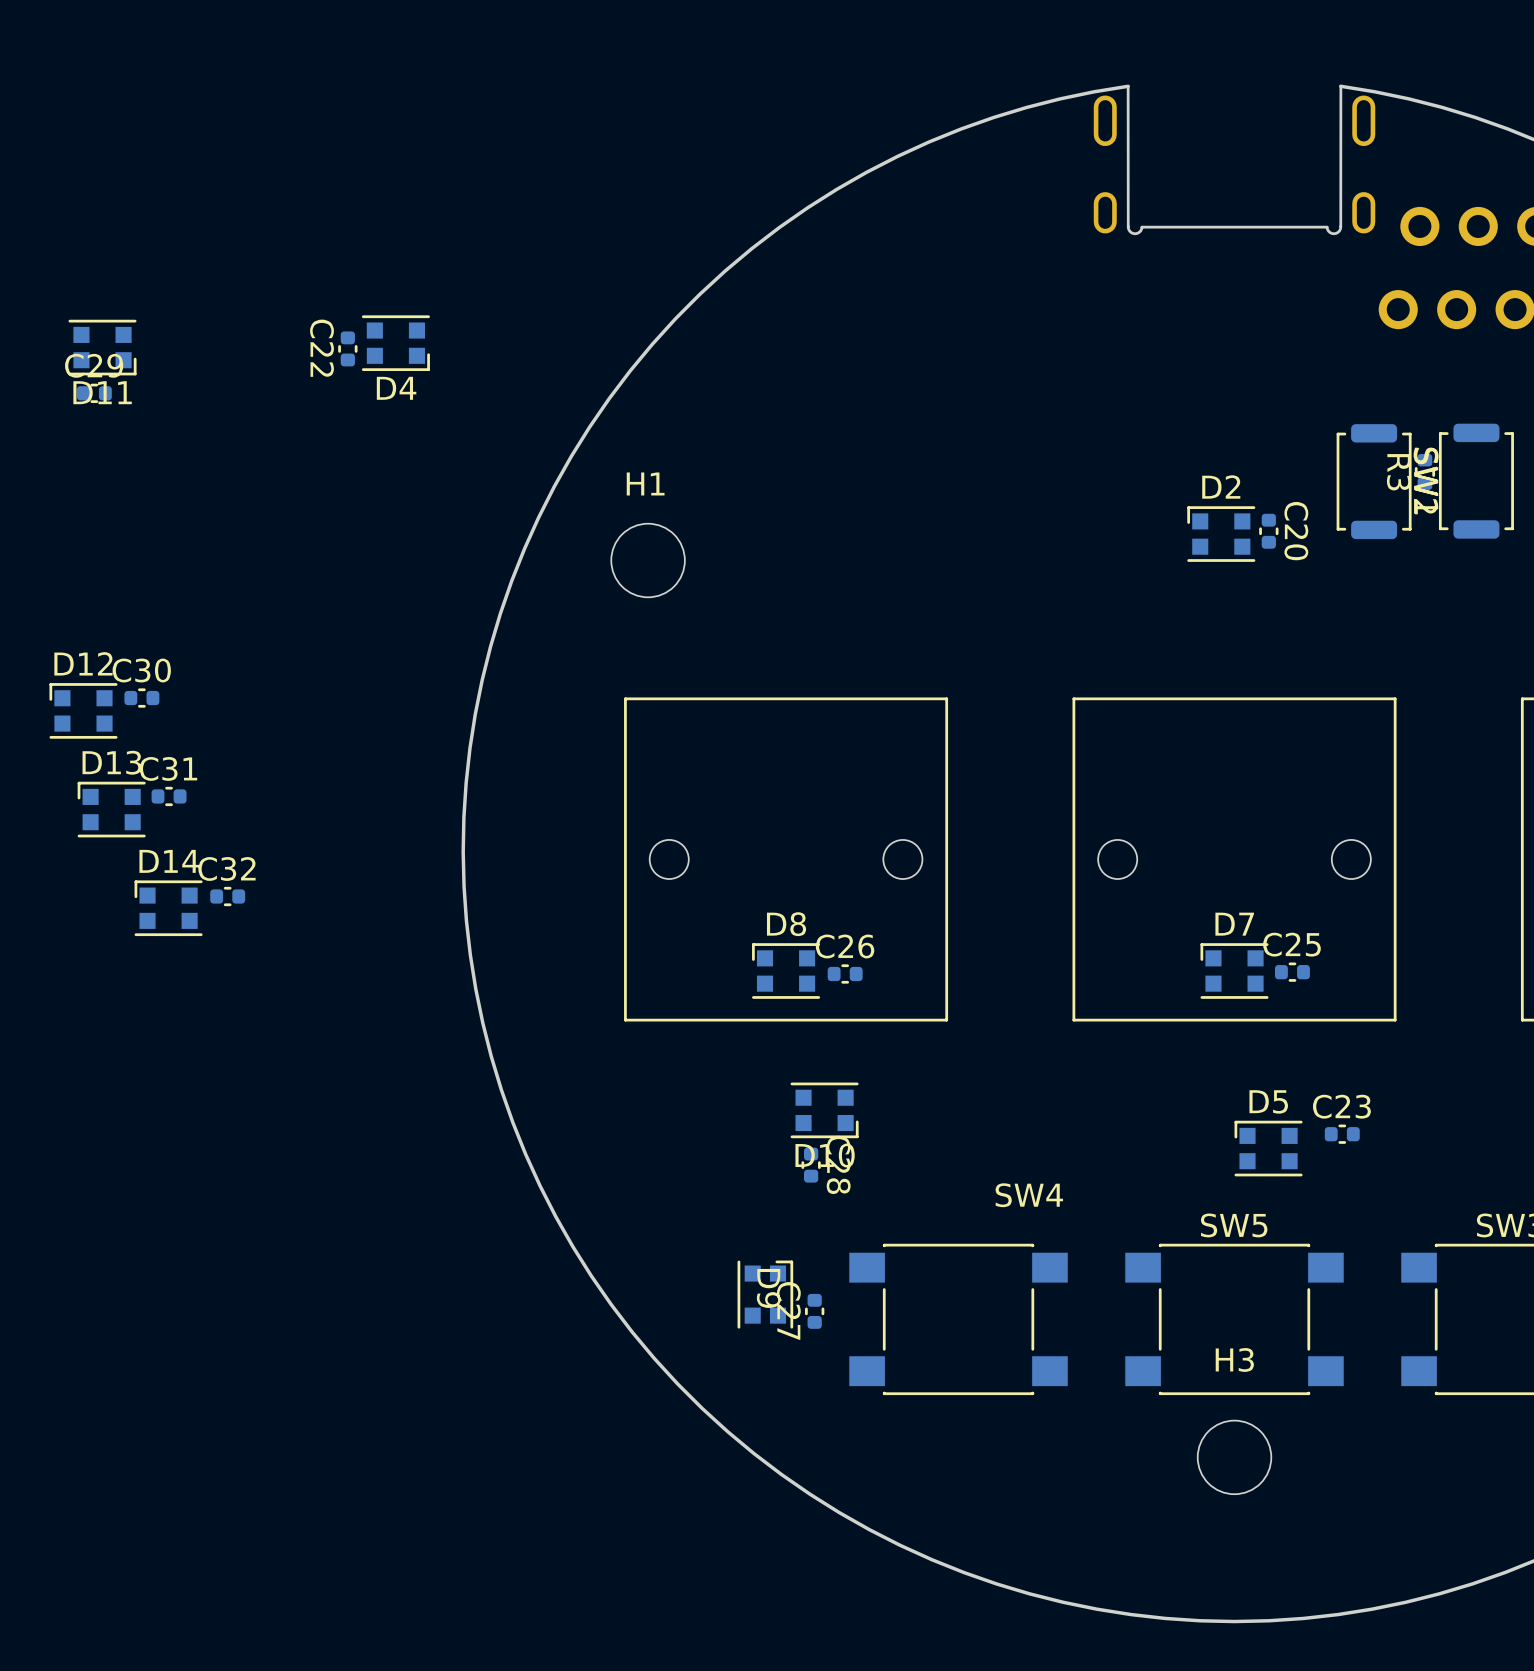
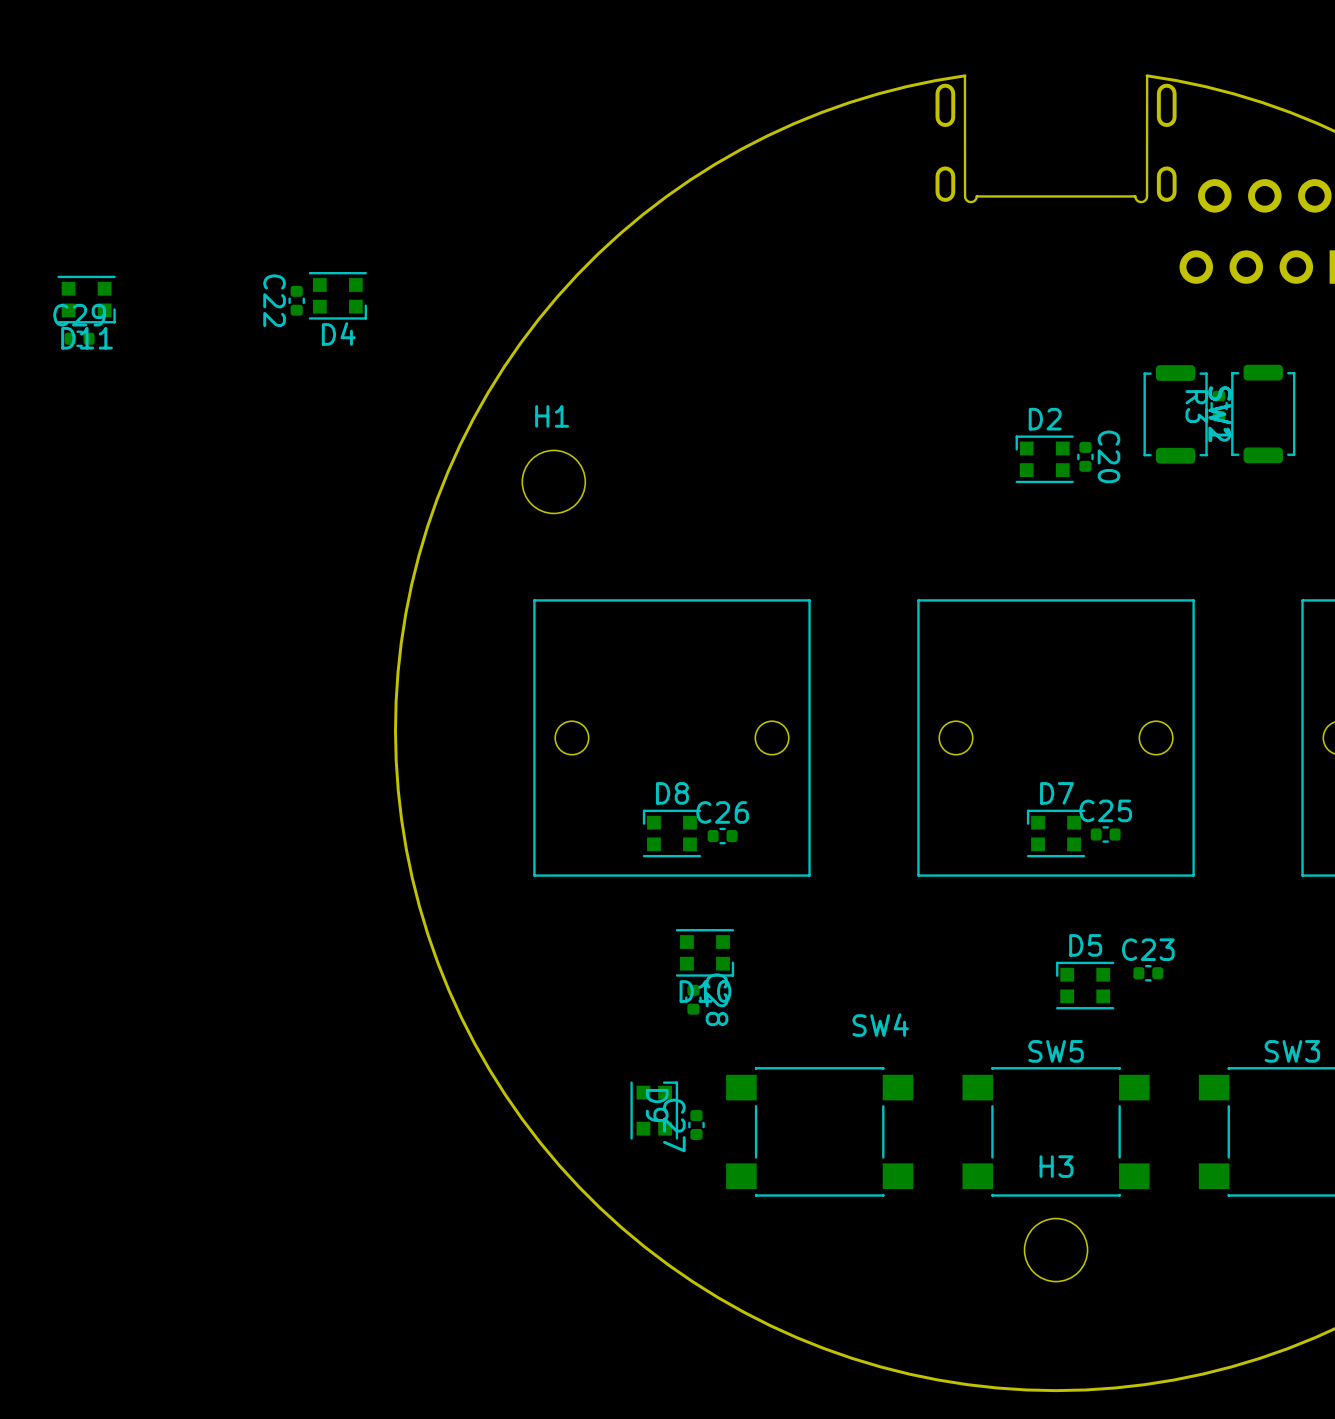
C30: (141, 698) -> none
D12: (83, 710) -> none
C31: (169, 796) -> none
D13: (111, 809) -> none
C32: (227, 896) -> none
D14: (168, 908) -> none

